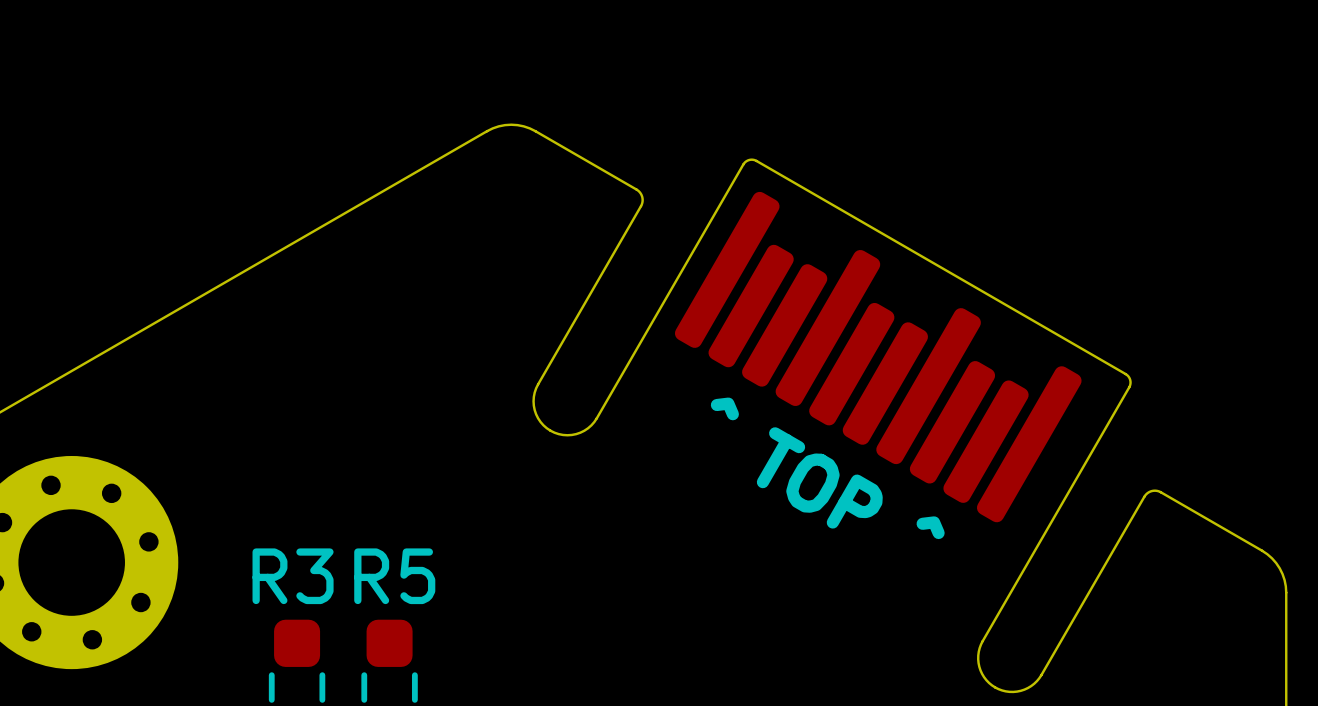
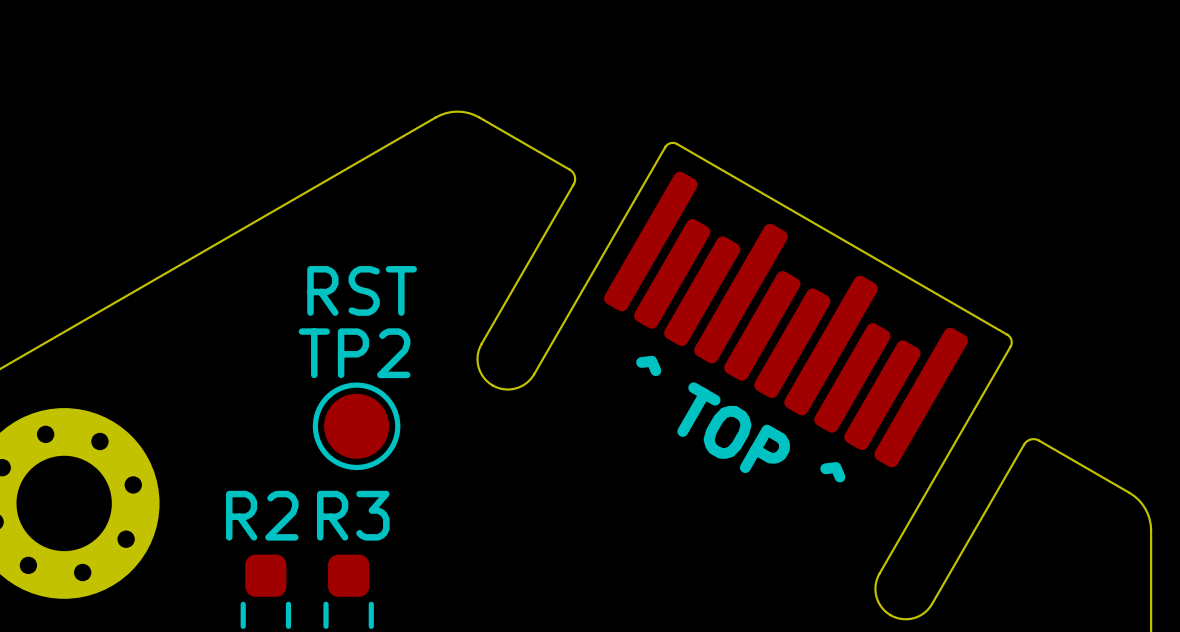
text: none -> RST (362, 290)
TP2: none -> (356, 426)
R3 name: R3 (293, 576) -> R2 (262, 515)
R5 name: R5 (394, 576) -> R3 (353, 515)

